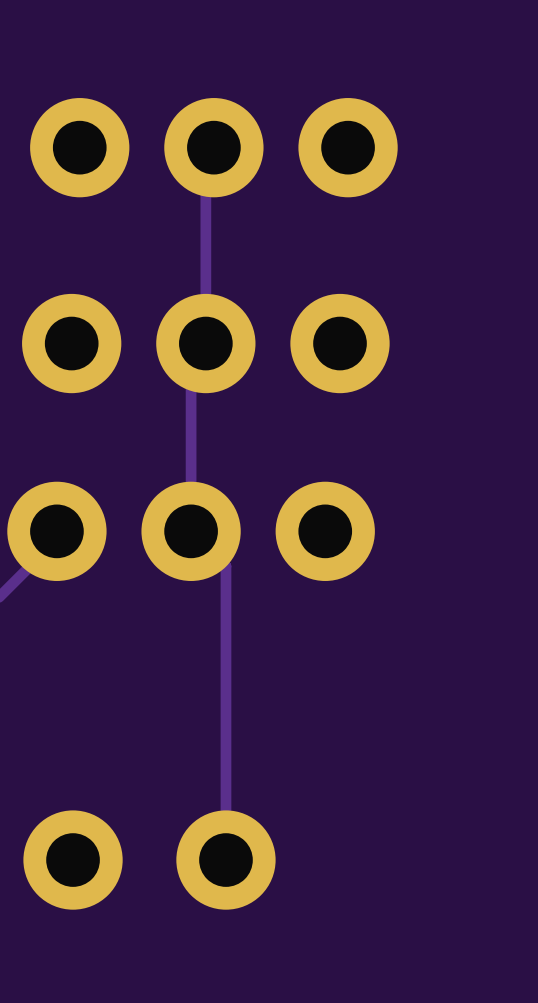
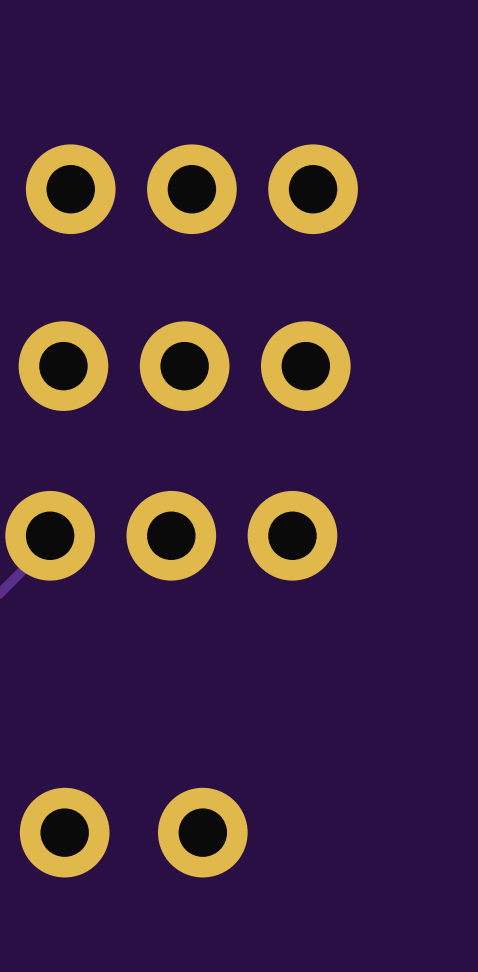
track: (213, 147) (205, 155) (205, 343) (191, 358) (191, 531) (225, 566) (225, 860) -> none

